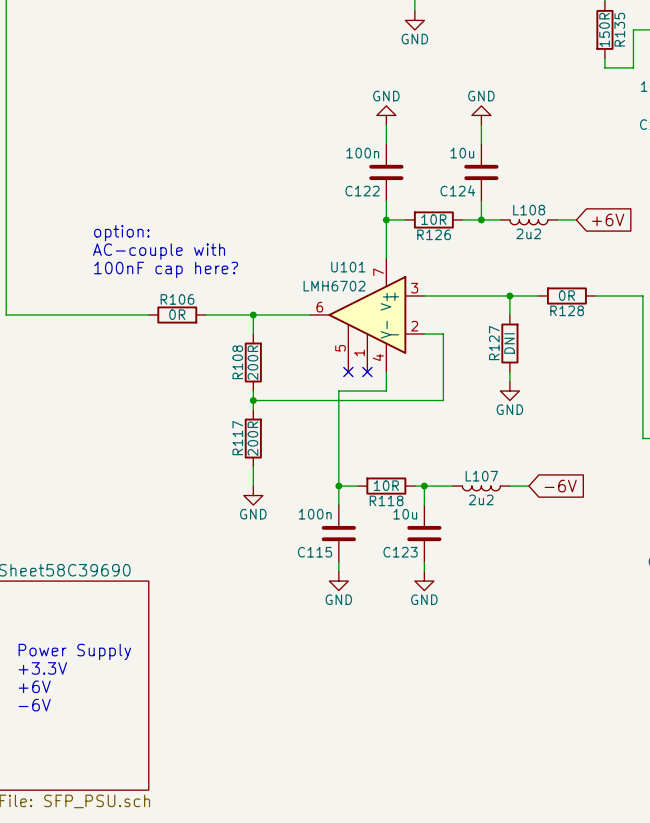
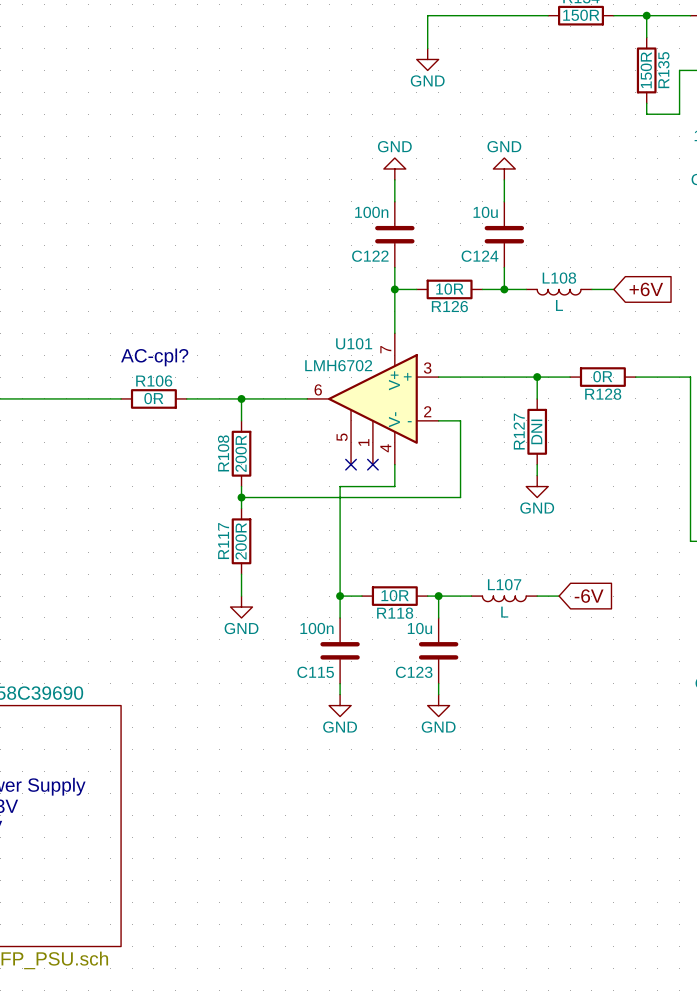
text: option: (121, 233) -> none
L108 value: 2u2 (528, 233) -> L (559, 305)
text: AC-couple with (159, 251) -> none
text: 100nF cap here? (166, 269) -> none
text: none -> AC-cpl? (154, 357)
L107 value: 2u2 (481, 499) -> L (504, 612)

